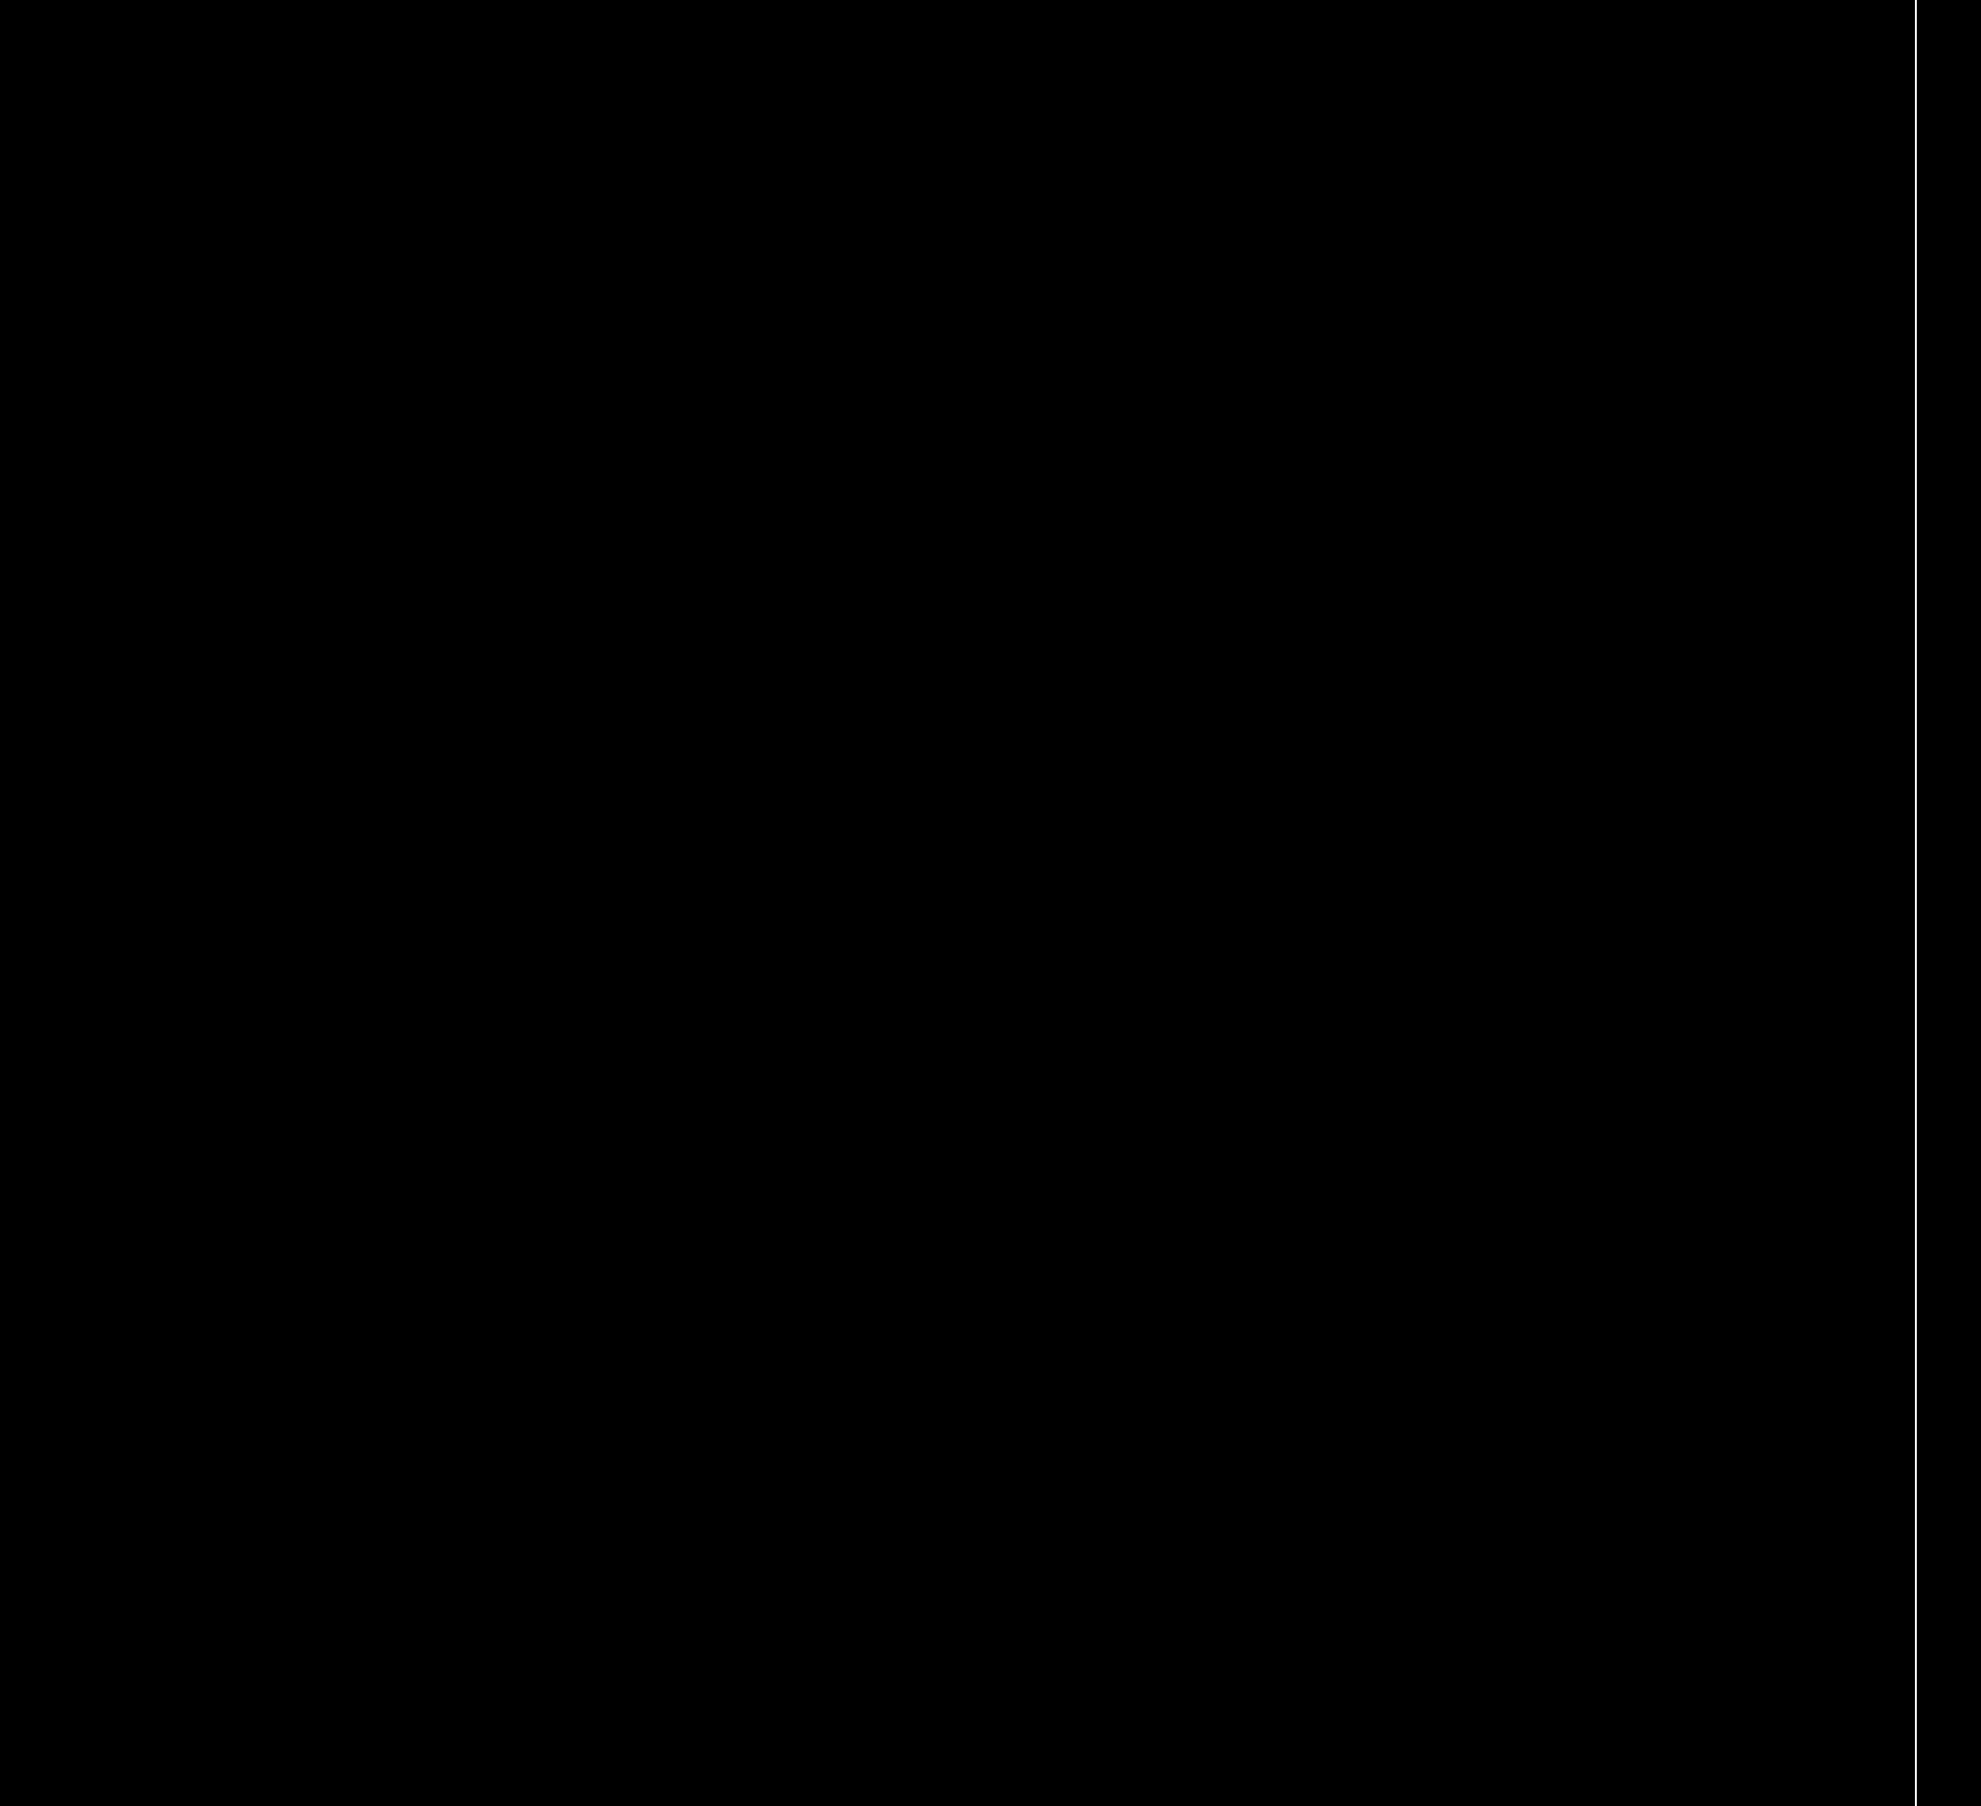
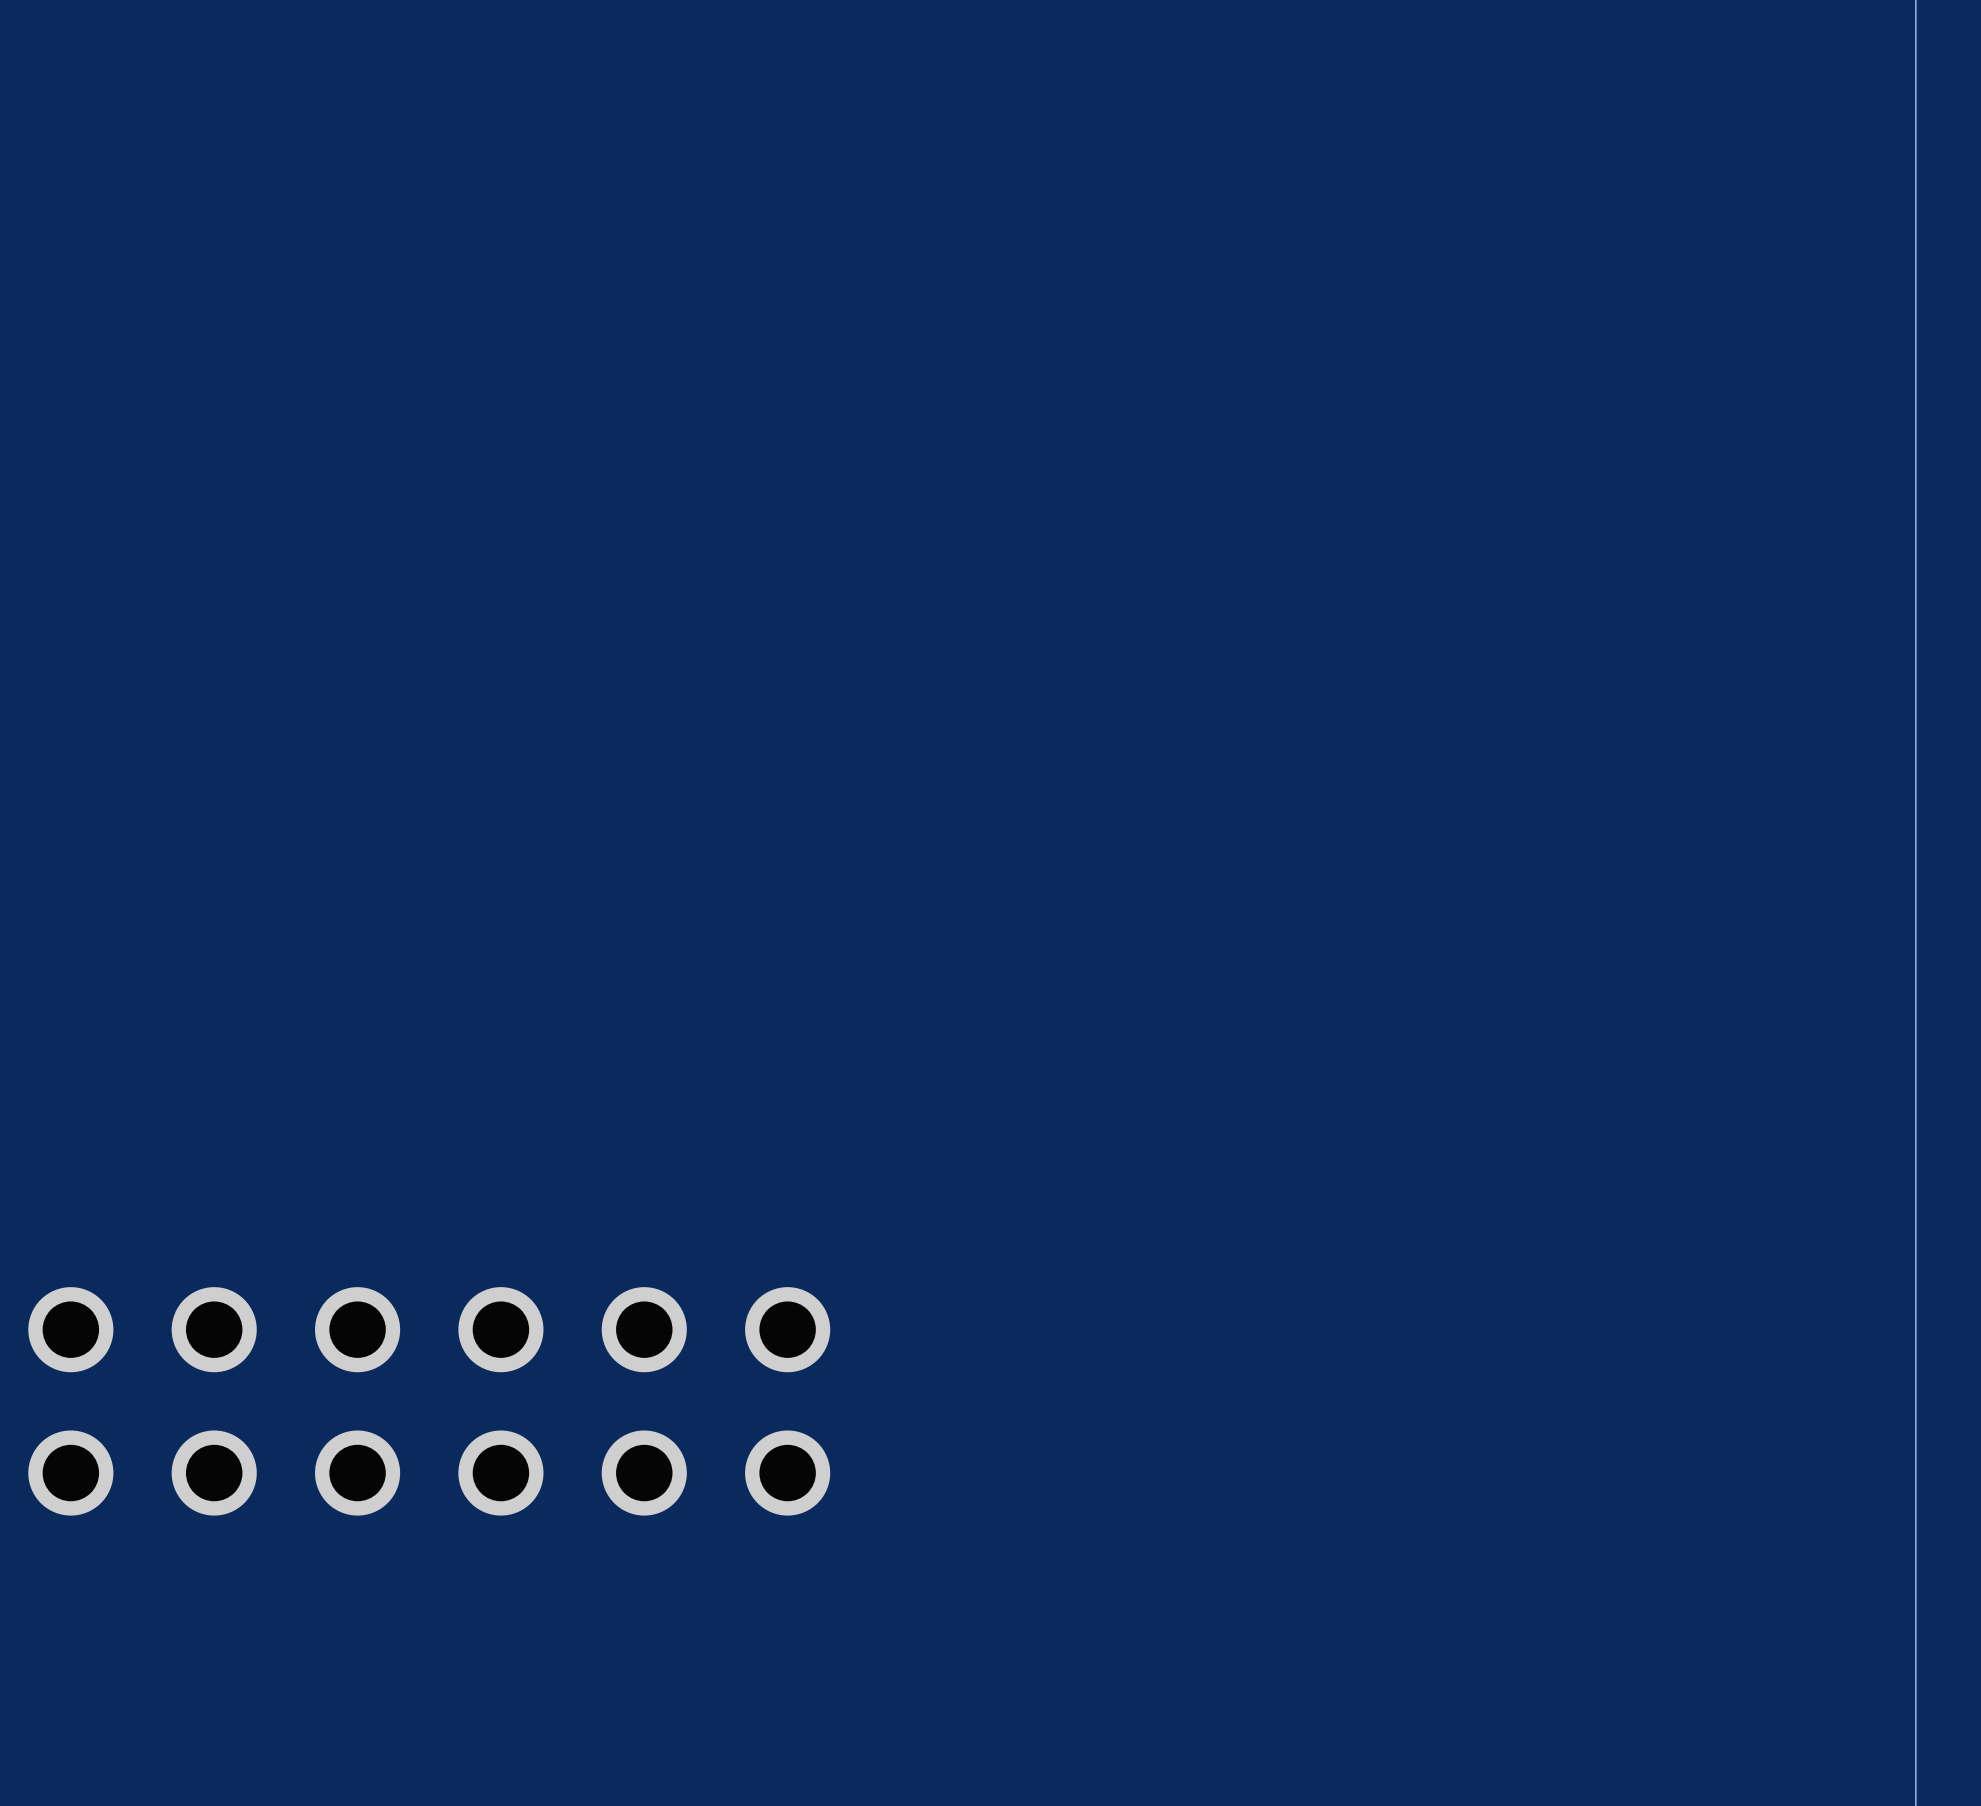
part: none -> (429, 1401)

